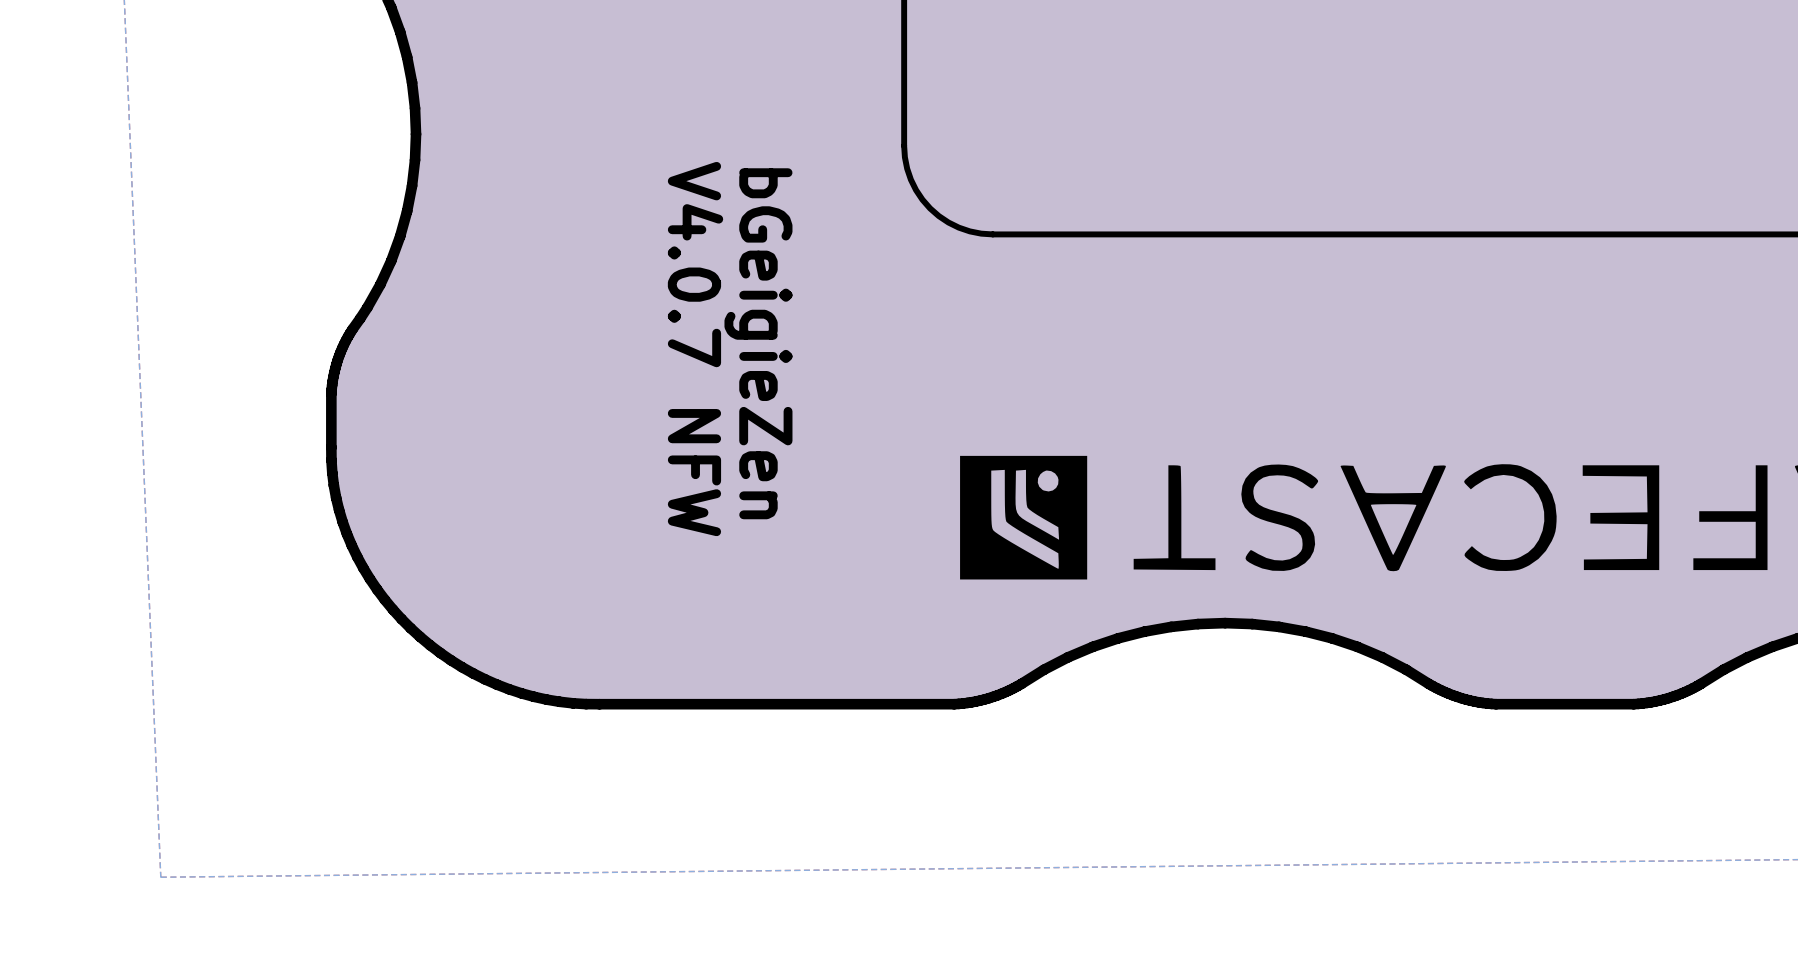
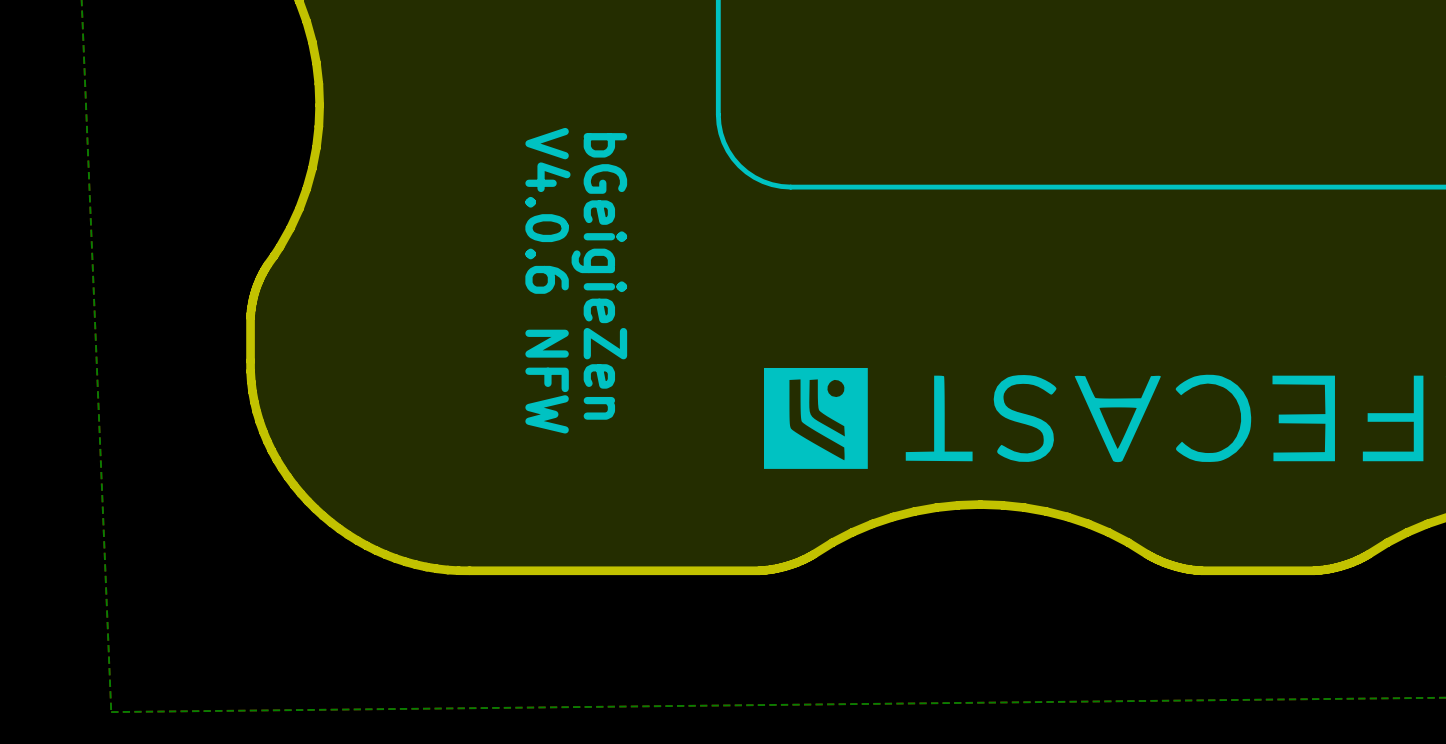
text: V4.0.7 NFW (695, 349) -> V4.0.6 NFW (547, 280)

